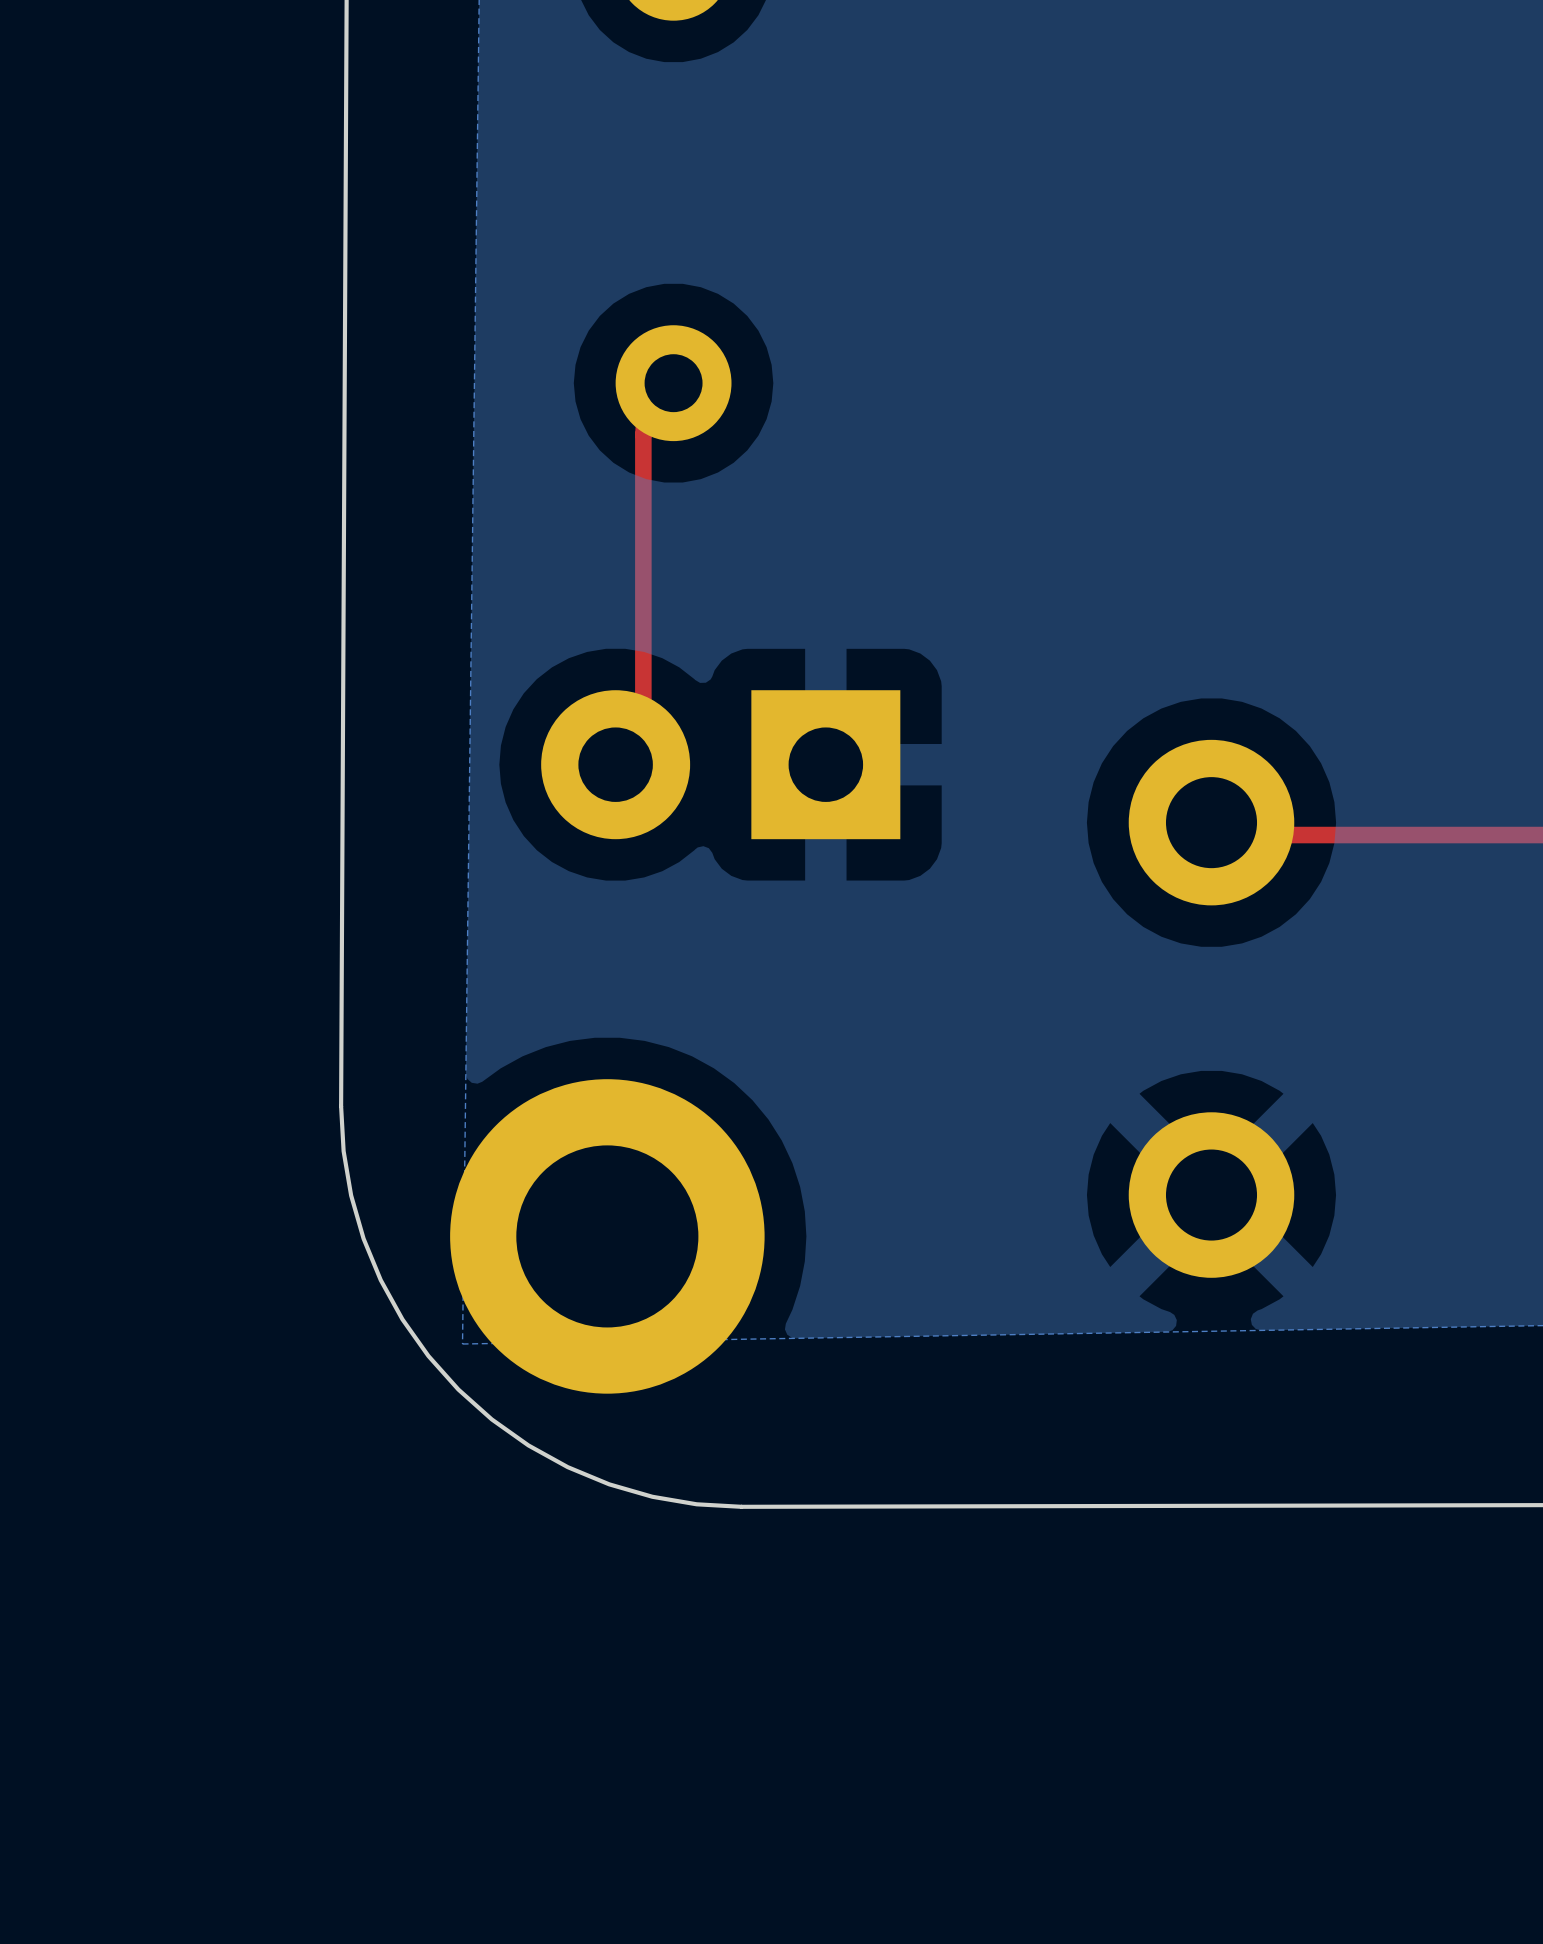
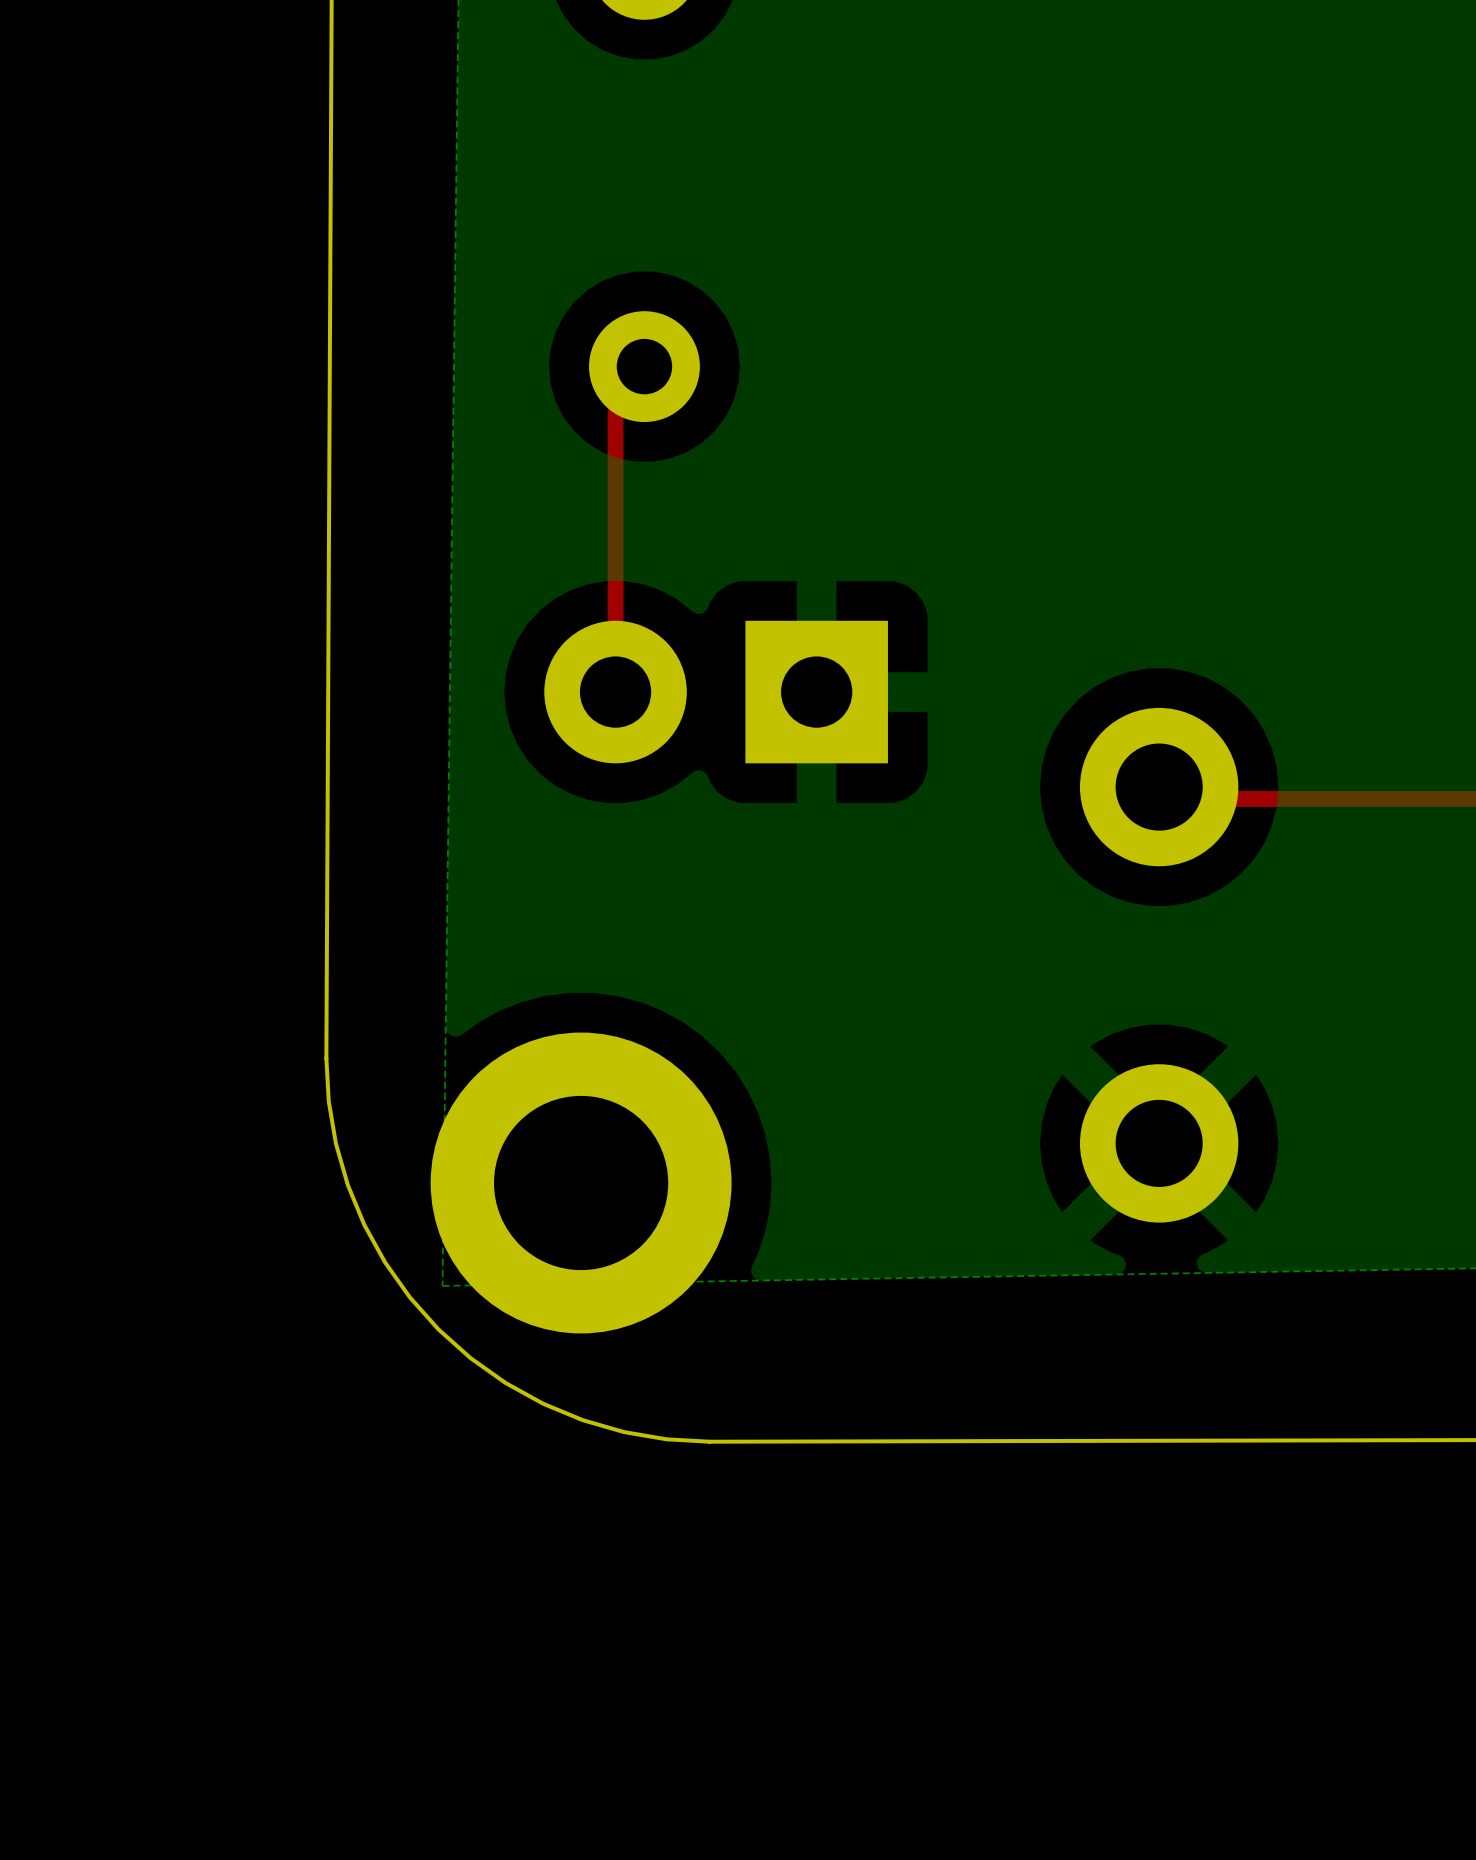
part position: (720, 764) -> (716, 692)

